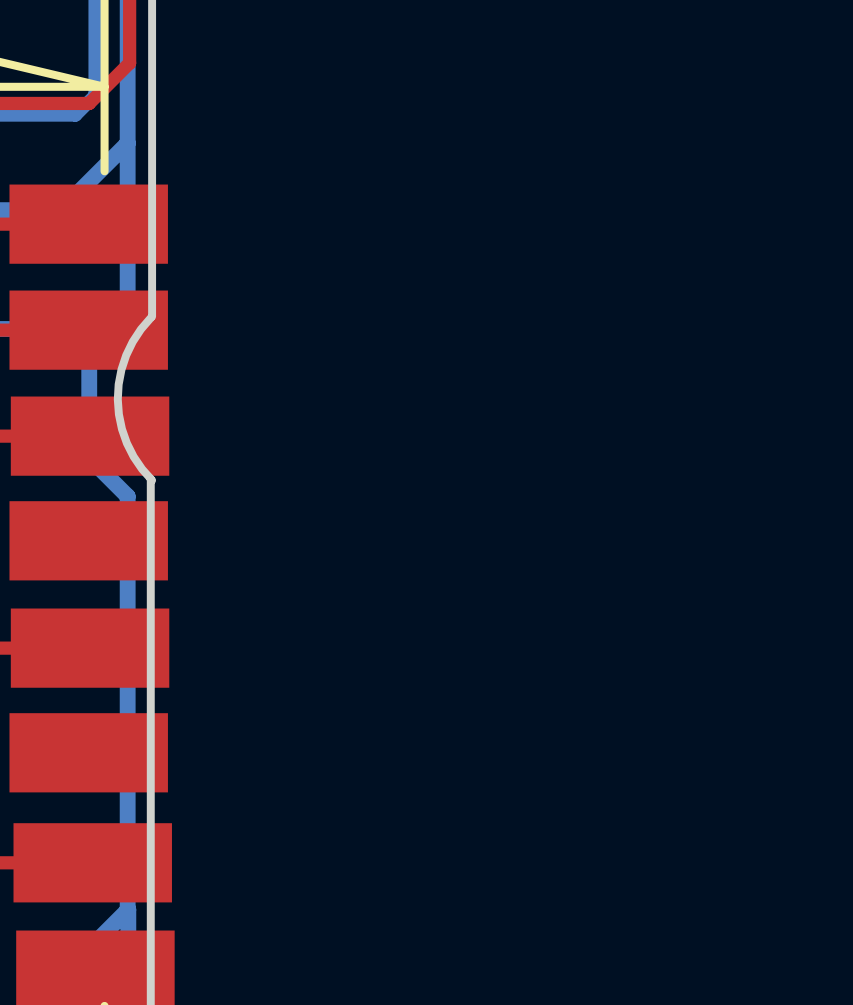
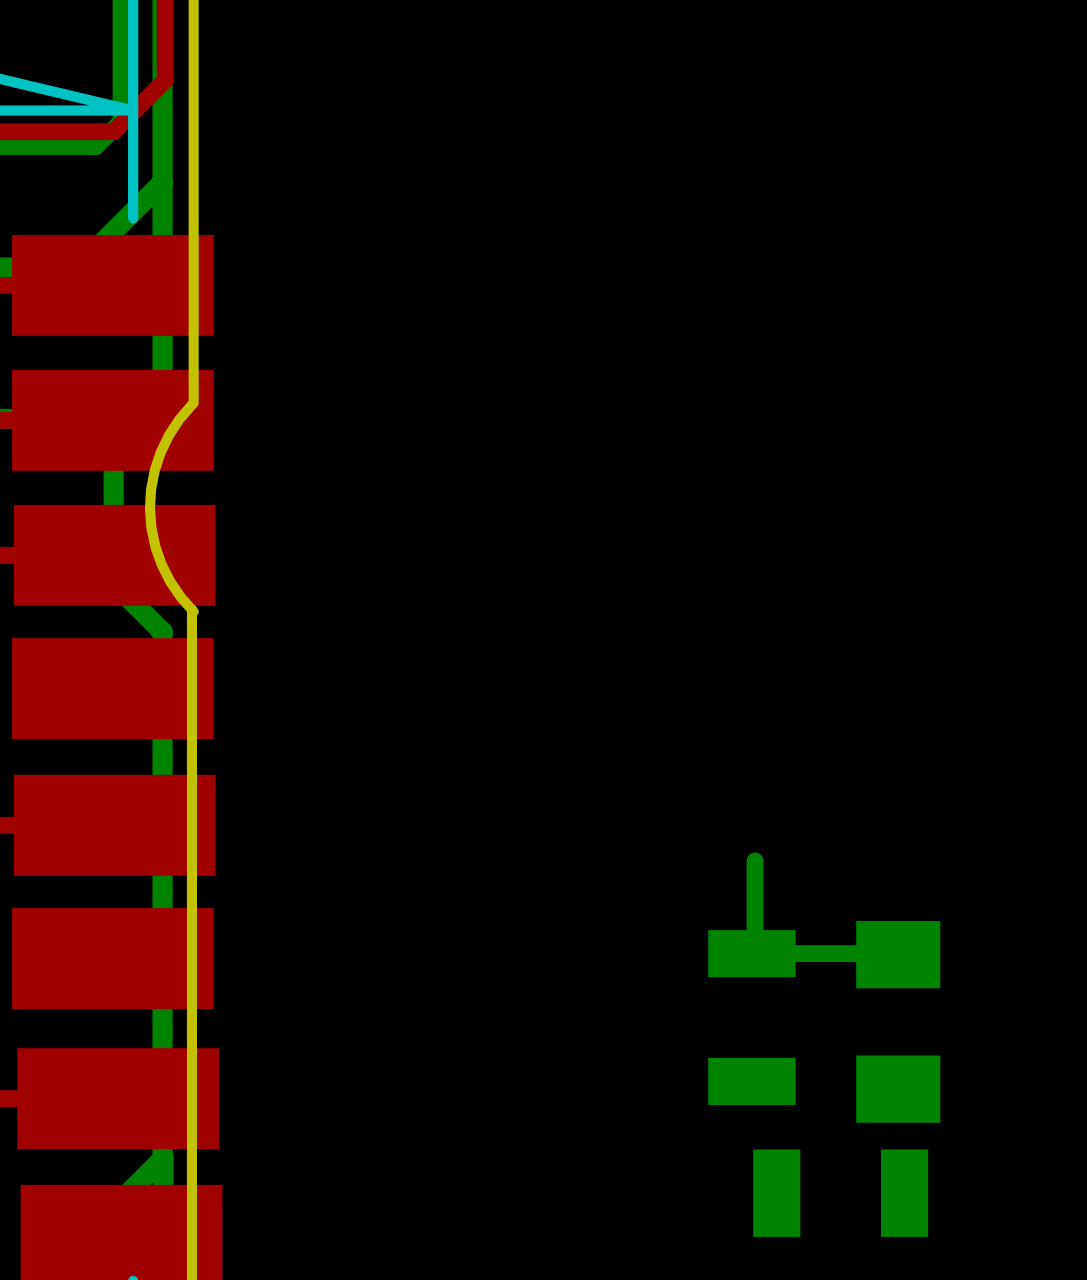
bottom track: none -> (755, 860) (755, 950) (751, 953) (898, 954)
part: none -> (751, 1017)
part: none -> (898, 1021)
part: none -> (840, 1193)

